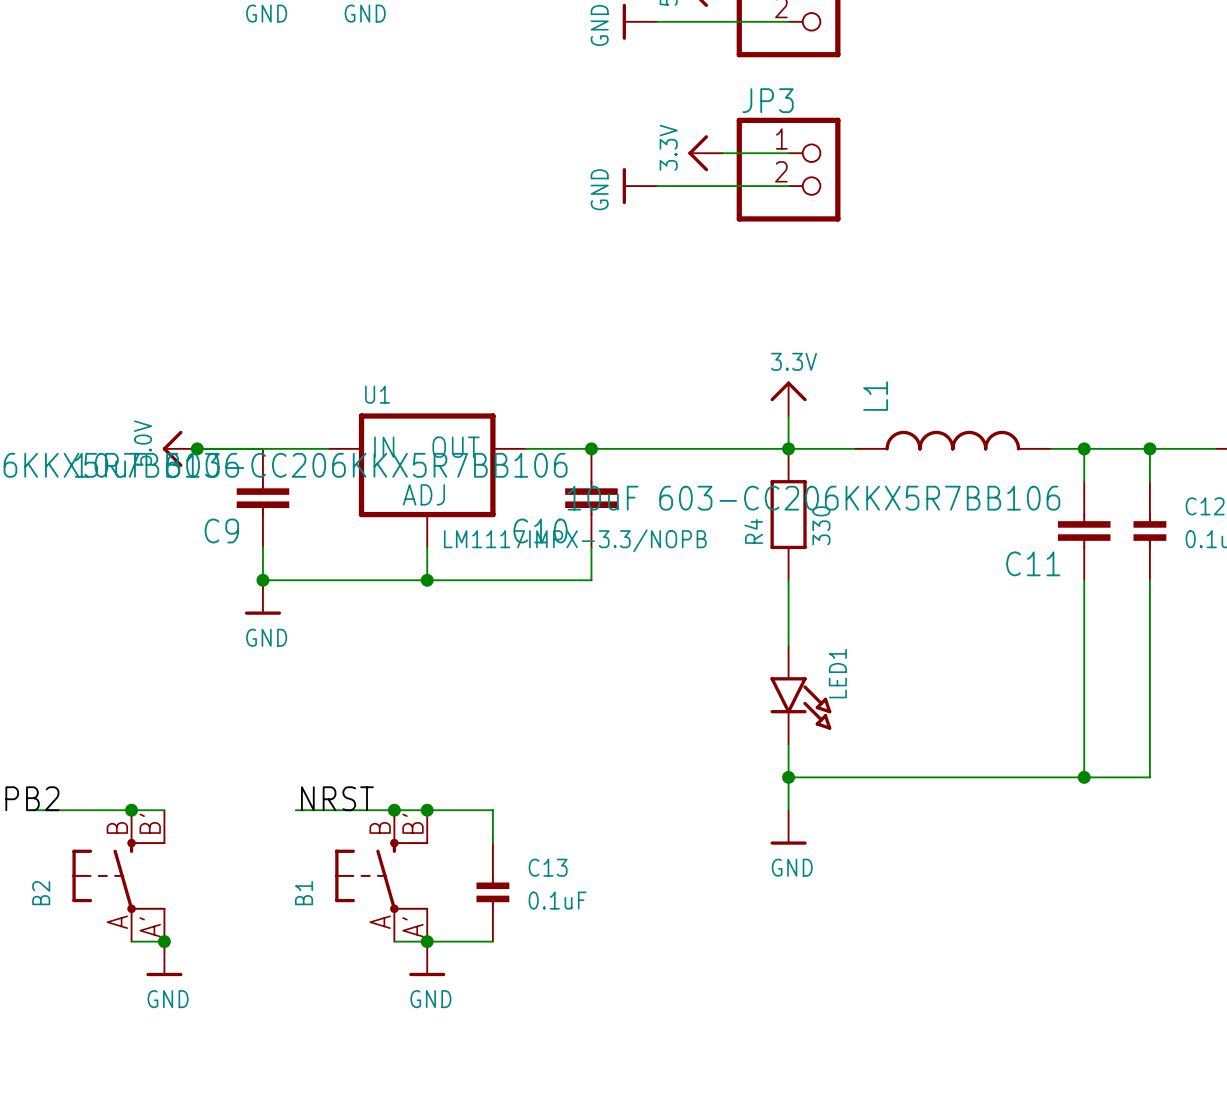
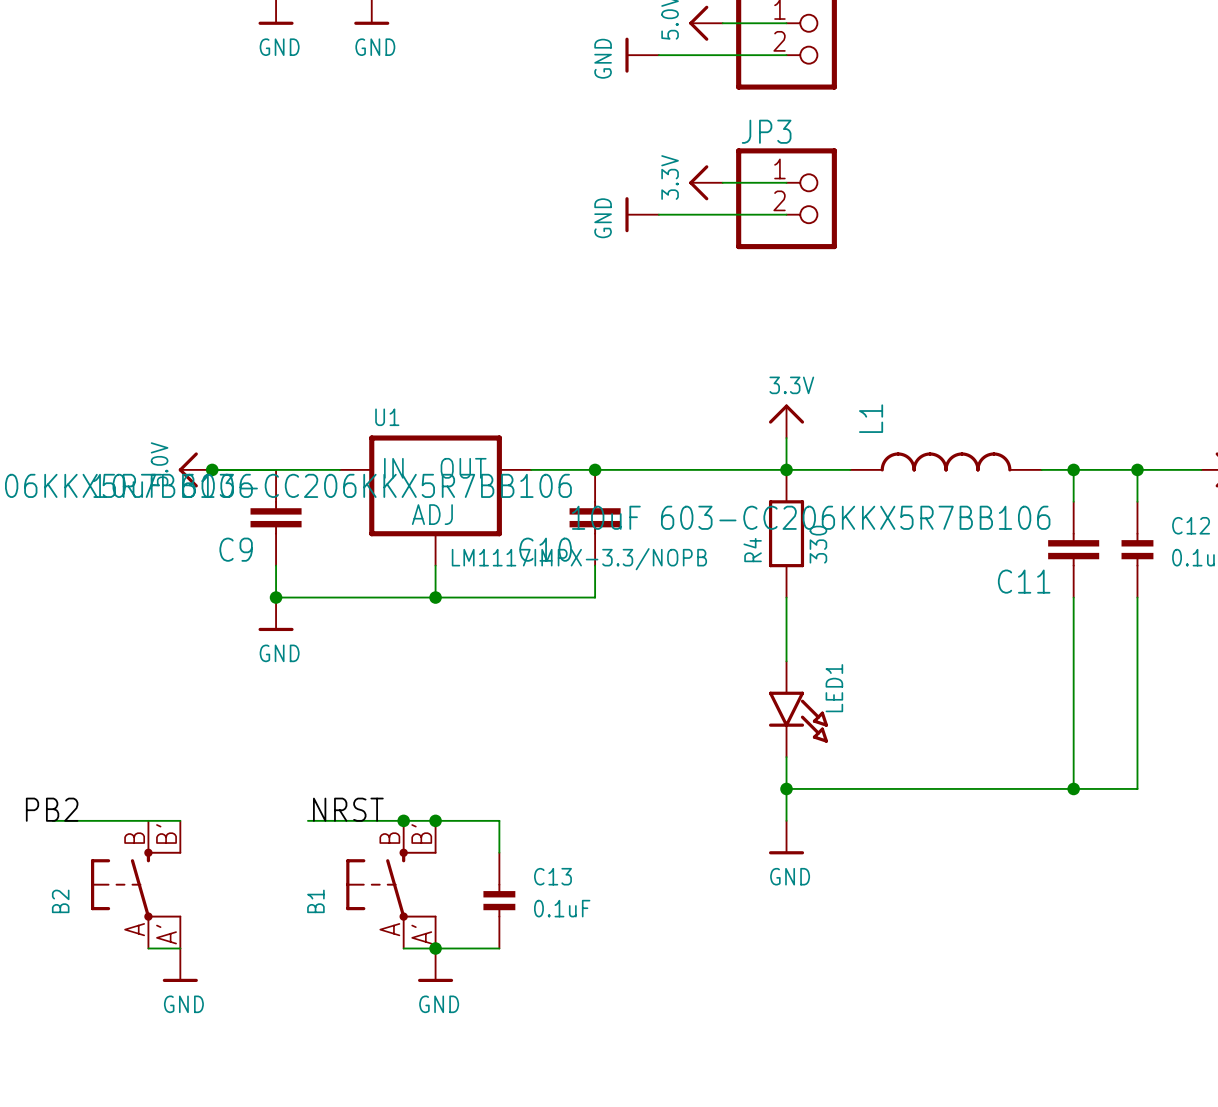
junction: (131, 810) -> none
junction: (164, 941) -> none

